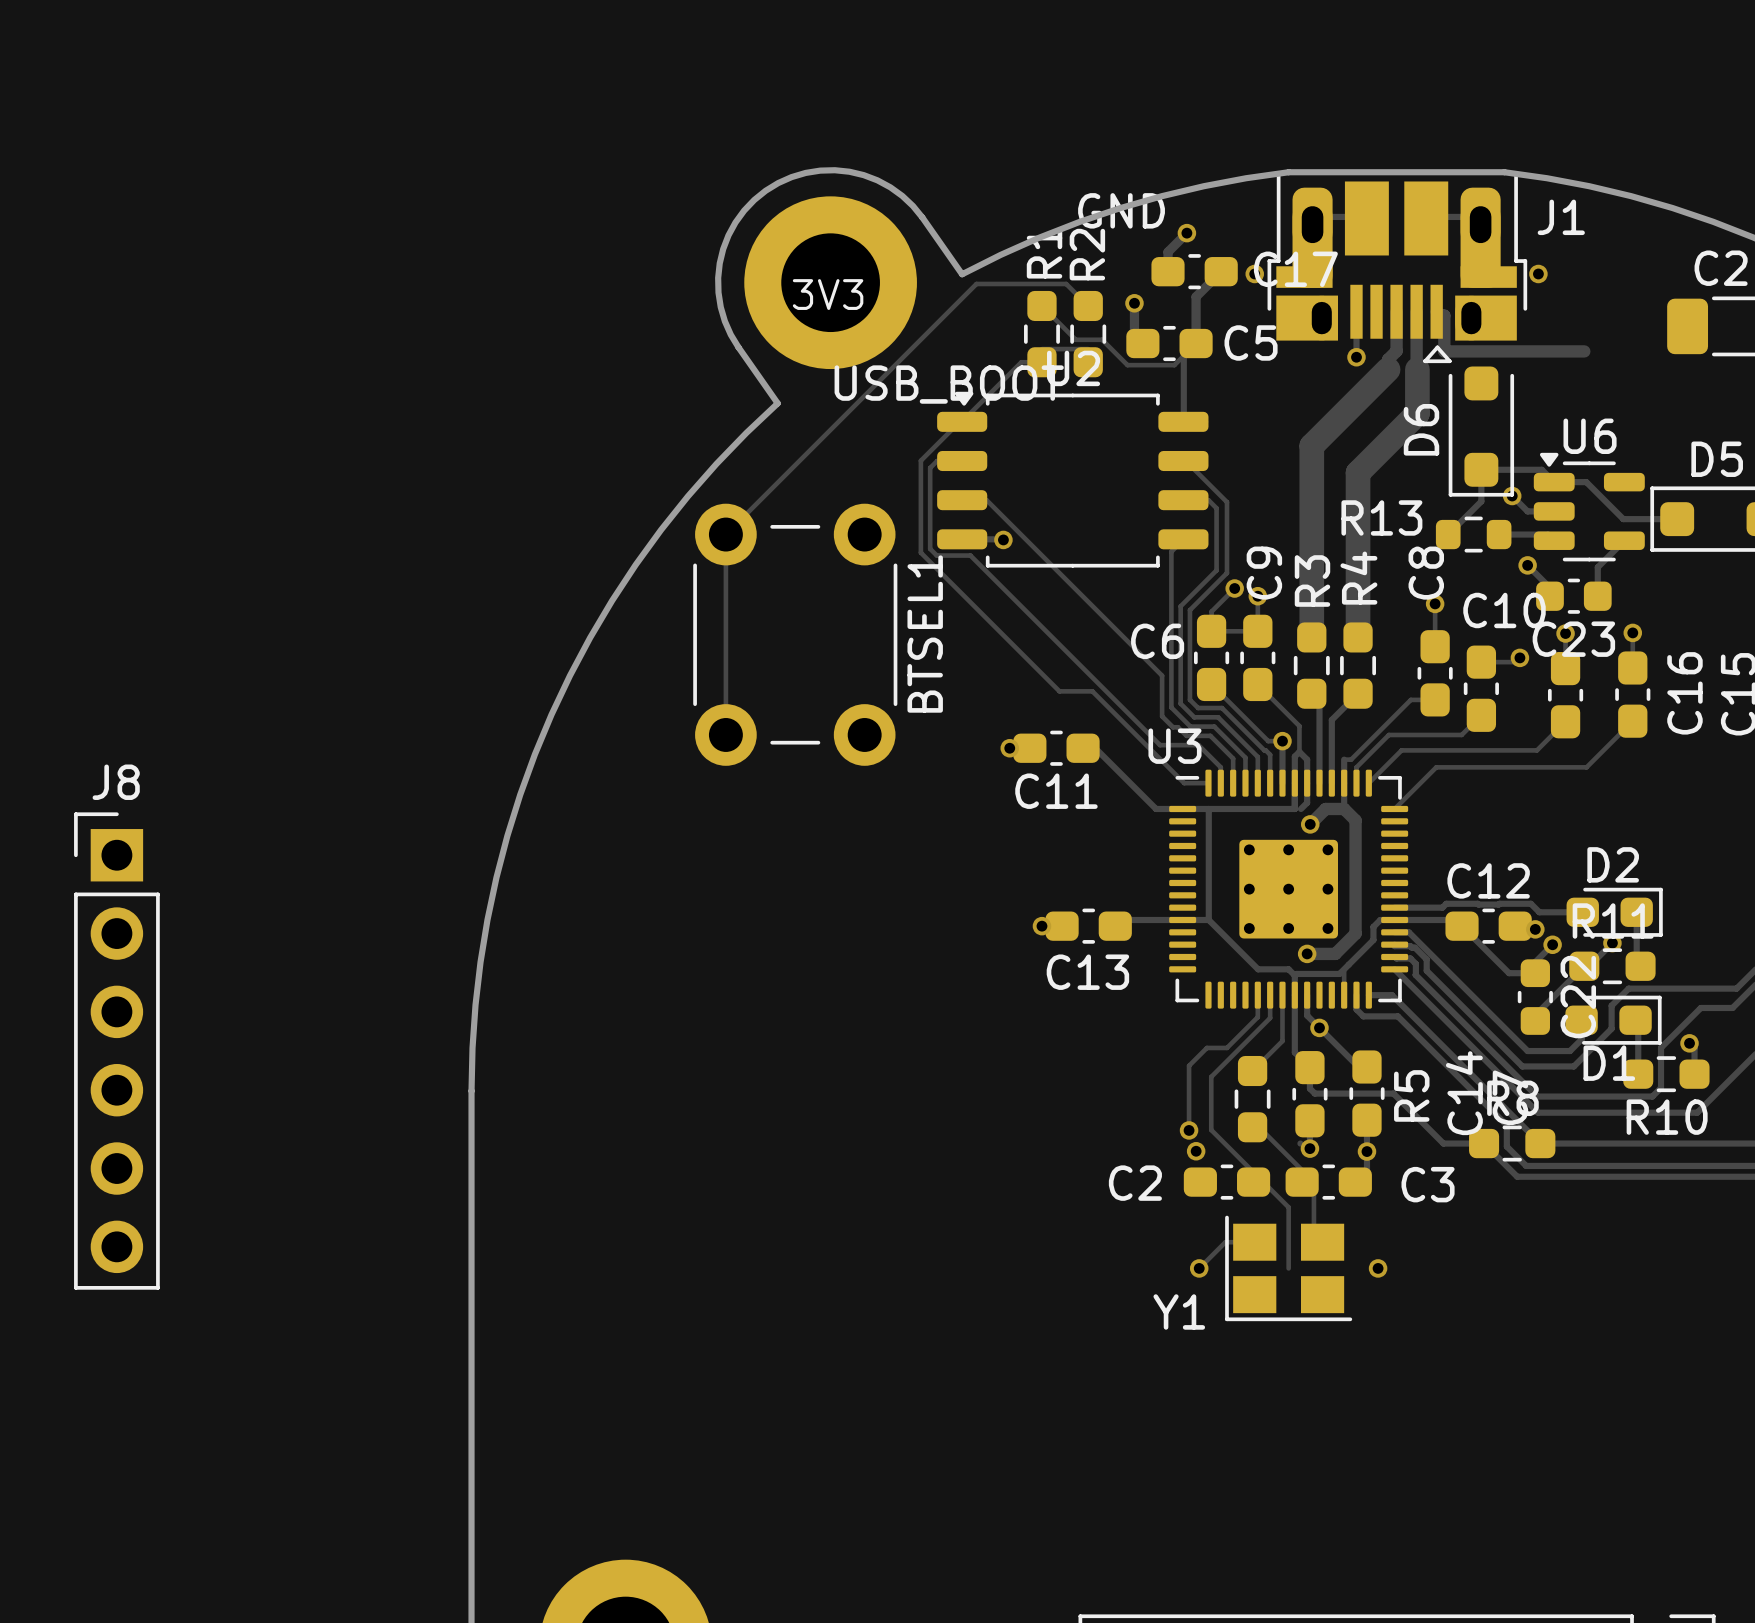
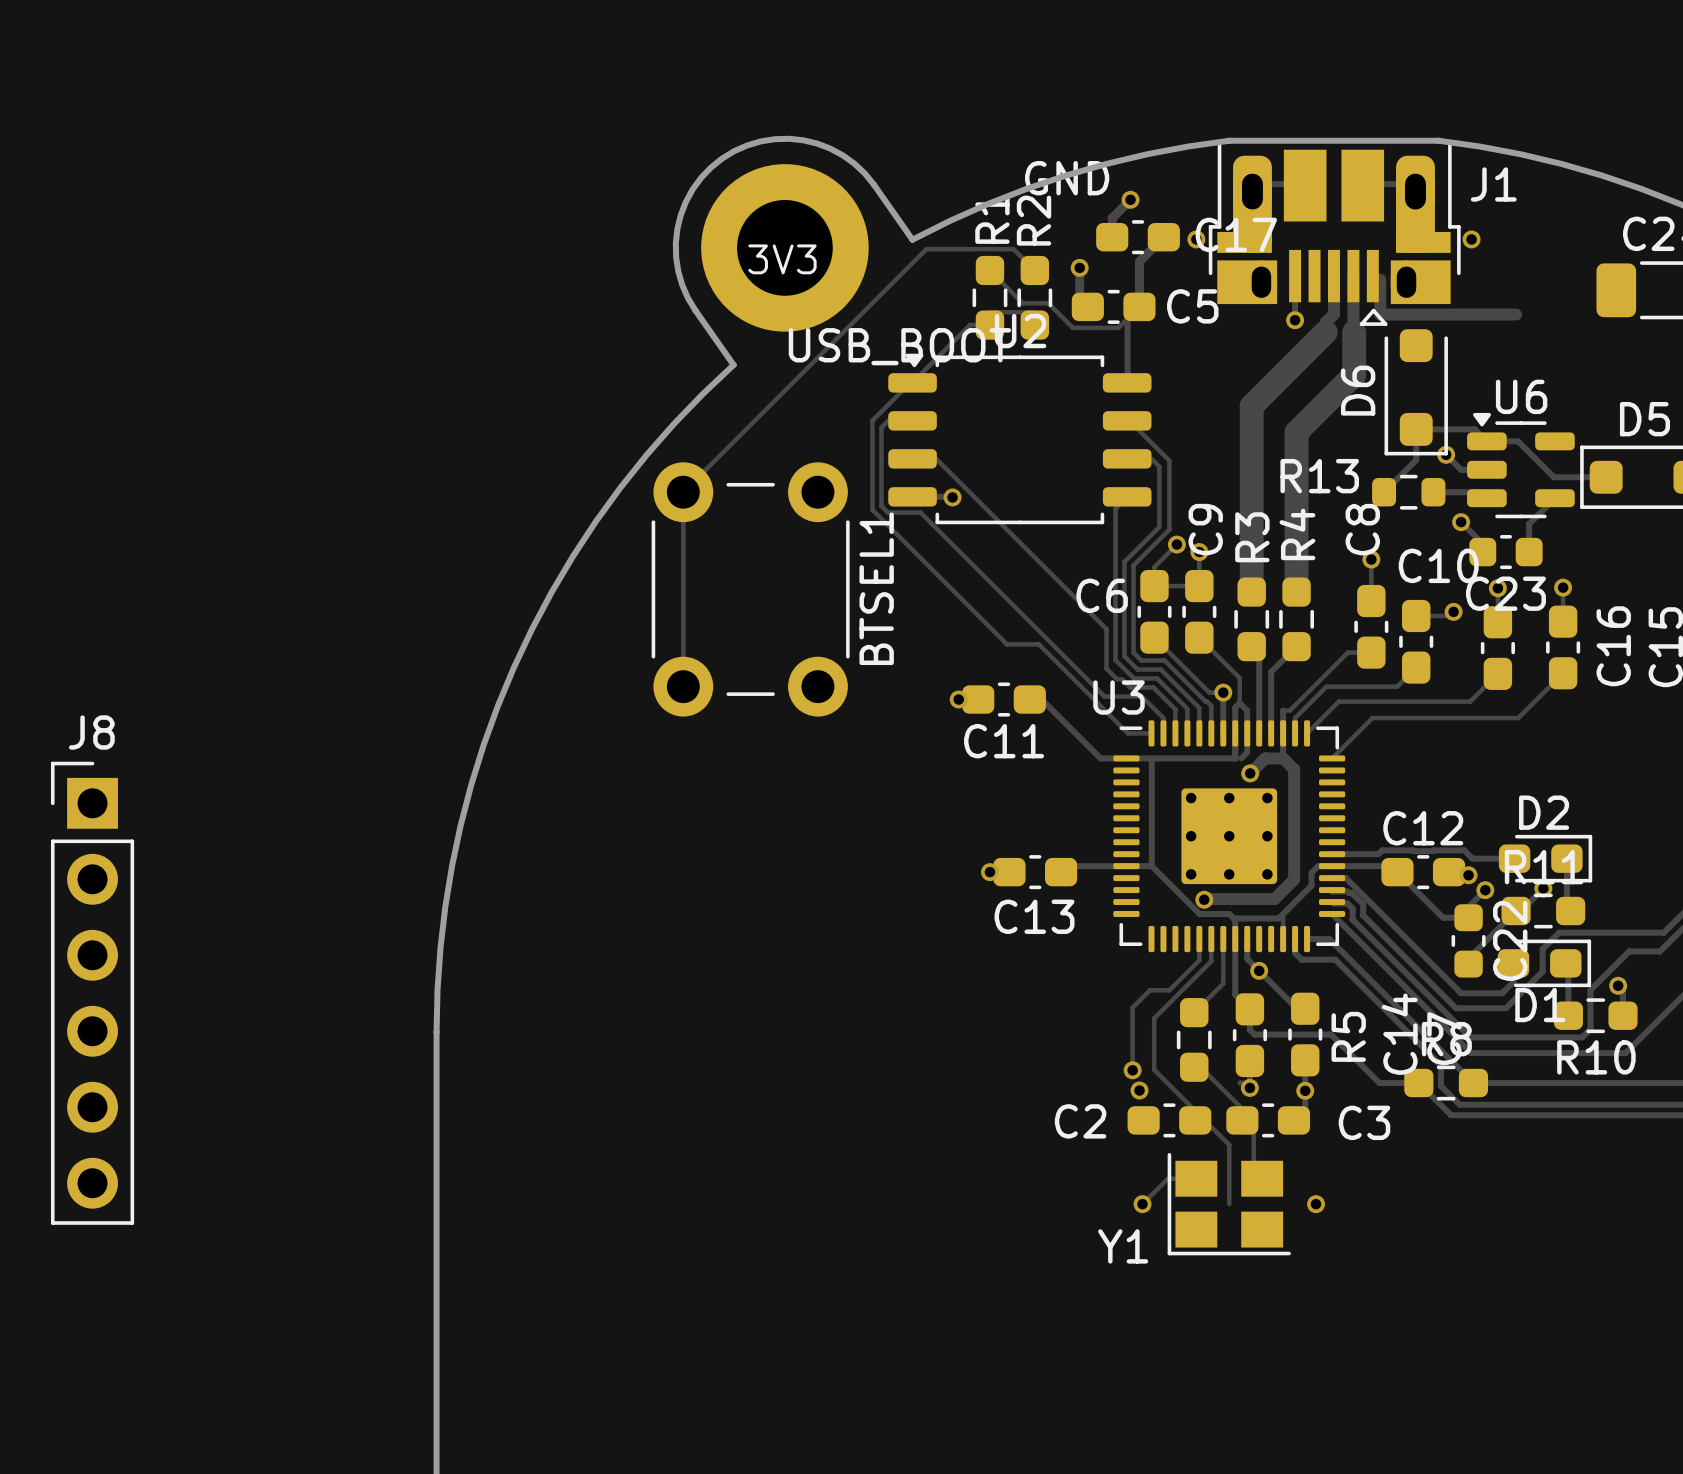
track: none -> (1247, 899) (1204, 899)
via position: (1307, 953) -> (1204, 899)

